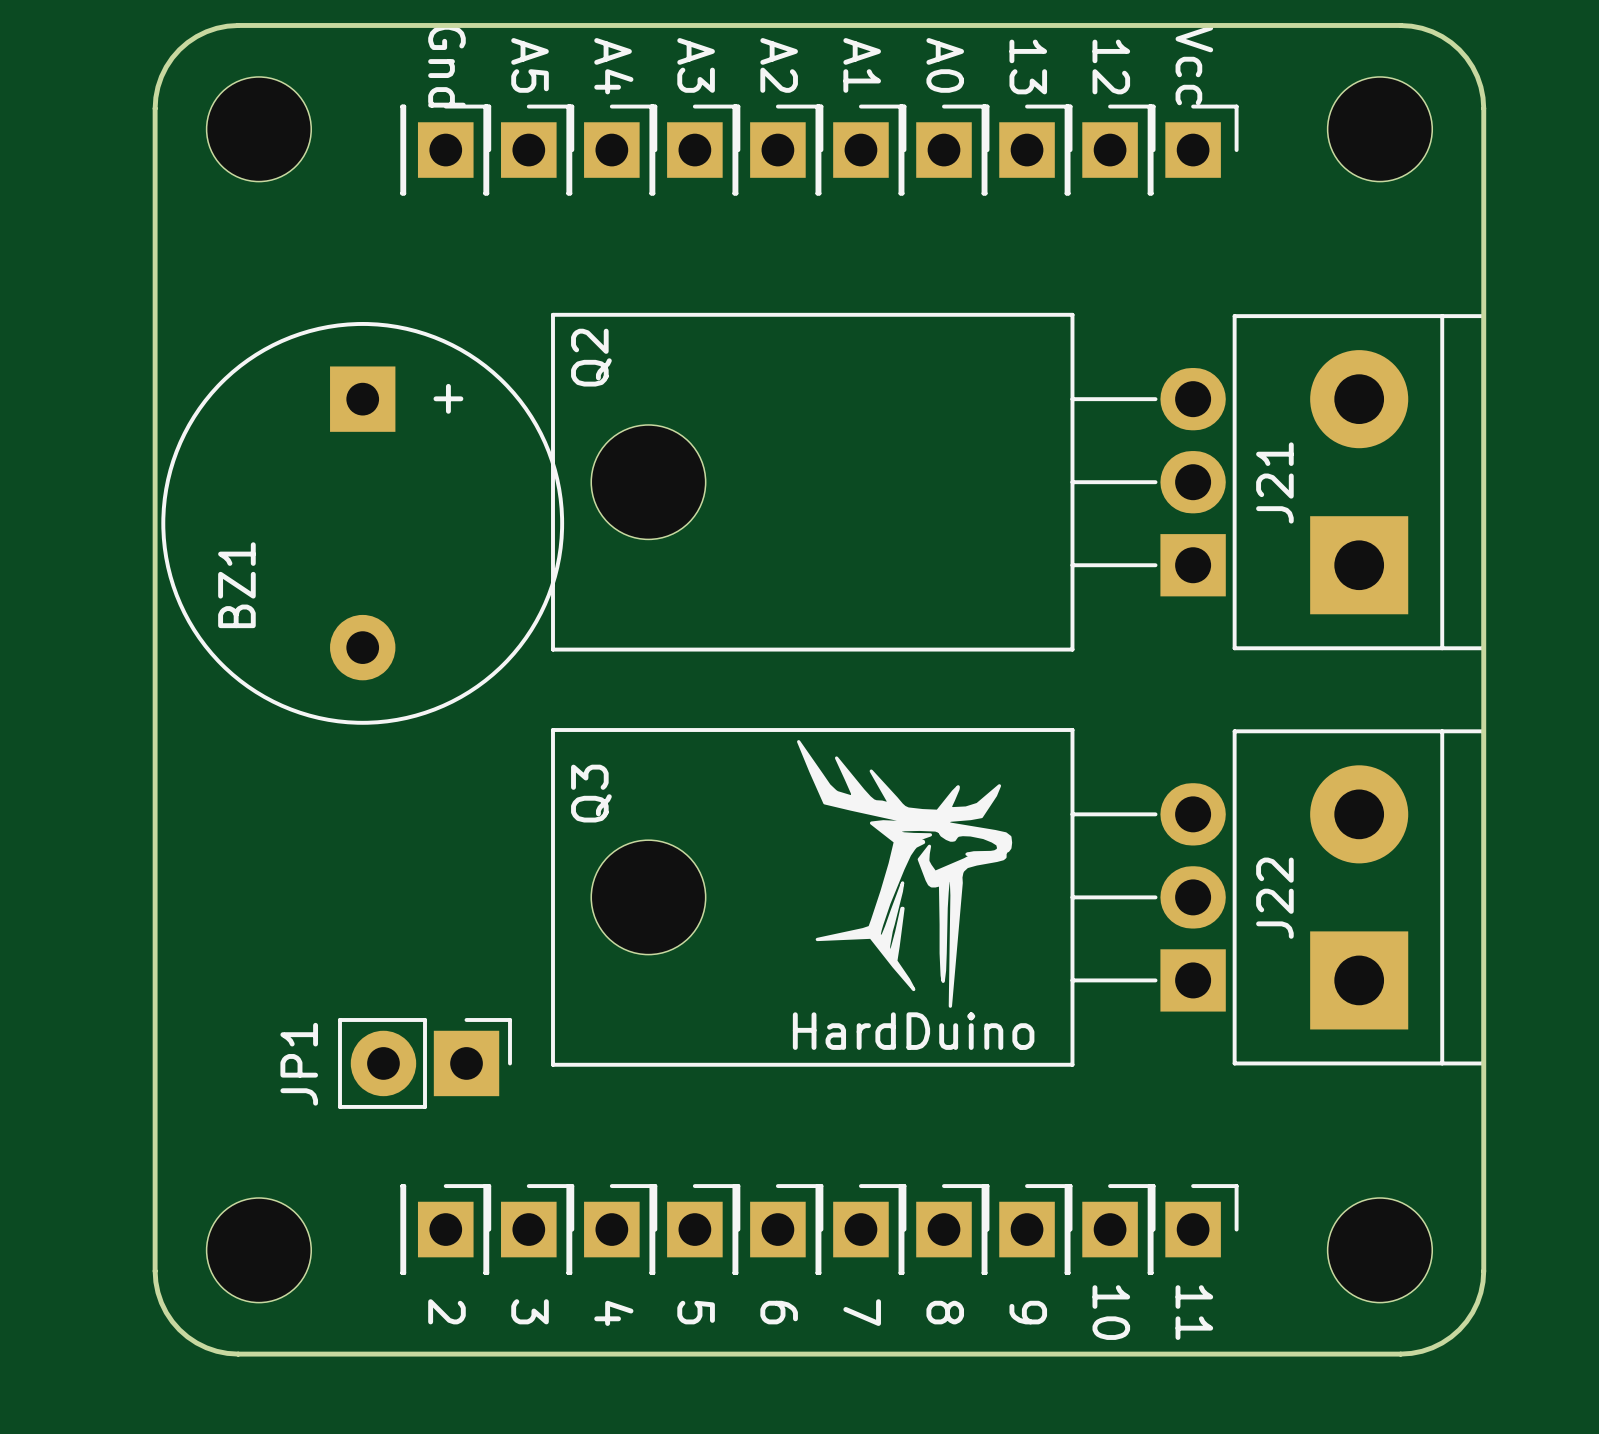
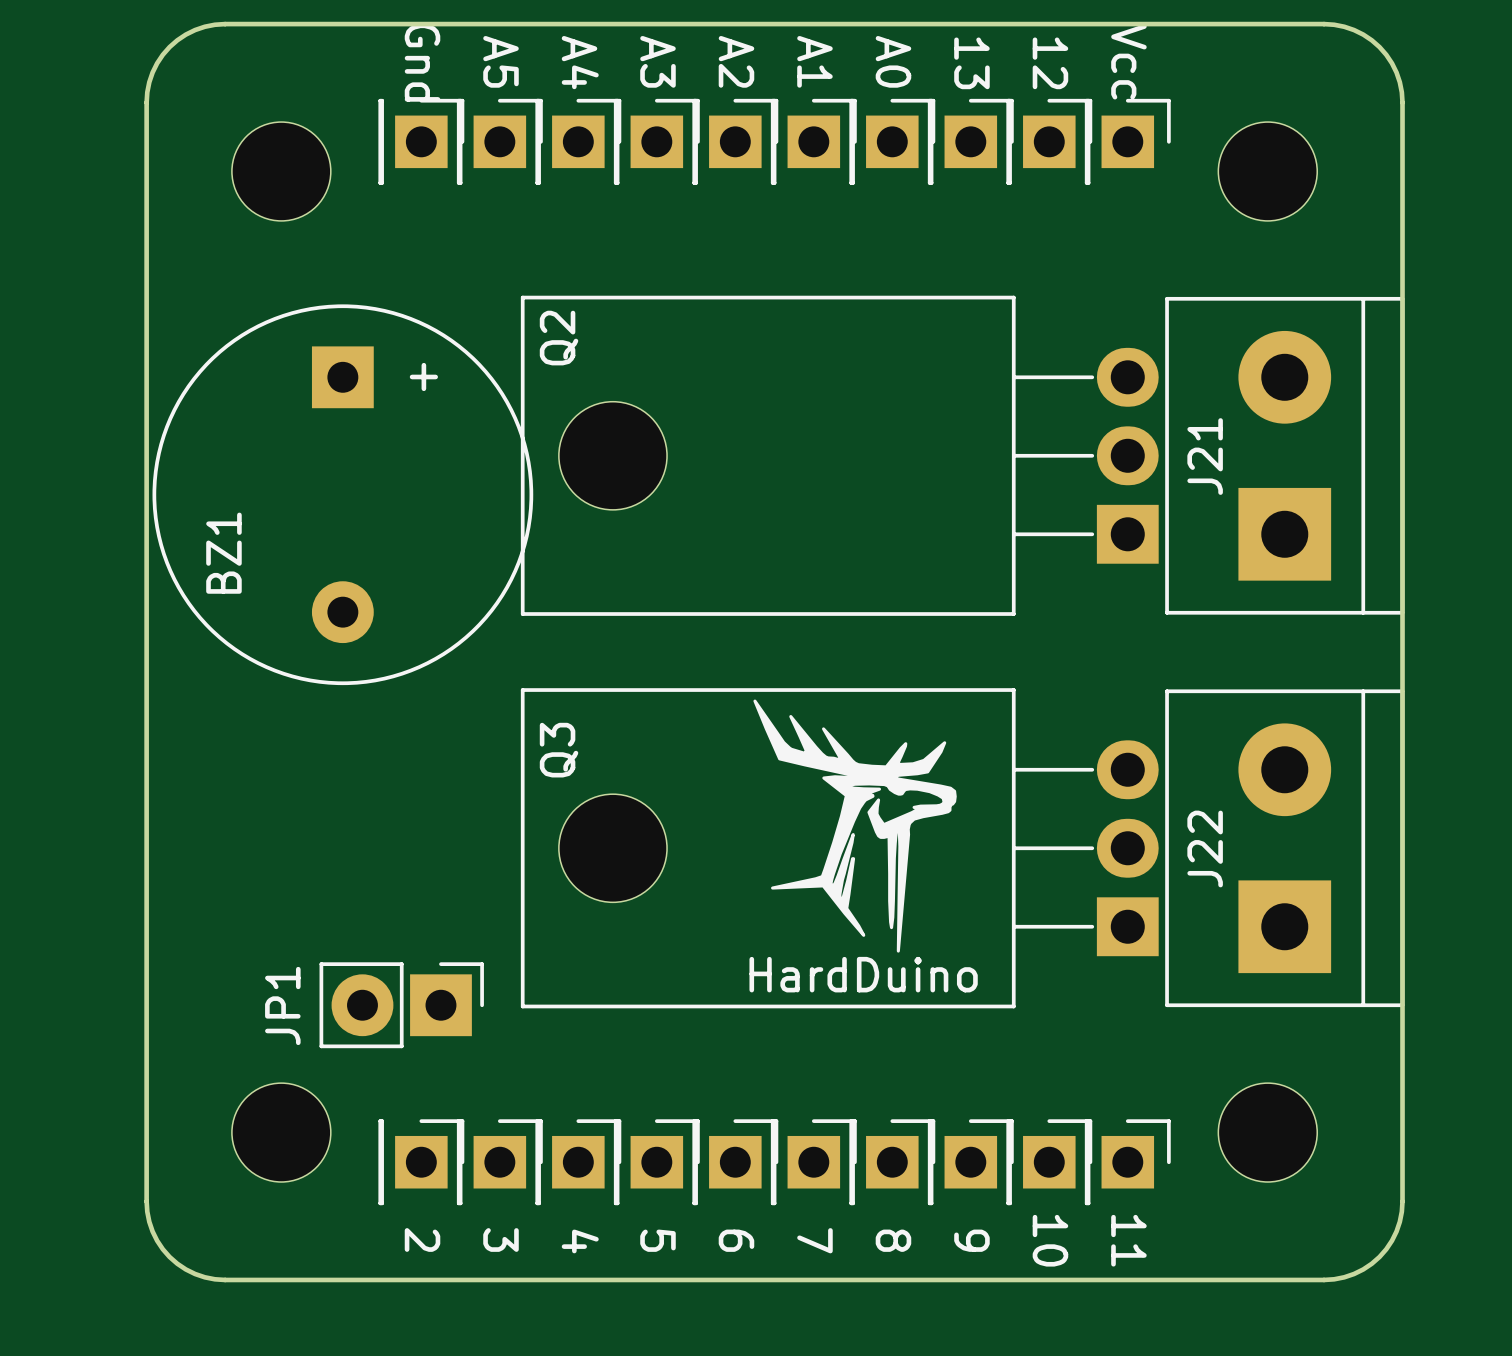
part position: (258, 129) -> (281, 171)
part position: (1379, 129) -> (1267, 171)
part position: (258, 1250) -> (281, 1132)
part position: (1379, 1250) -> (1267, 1132)

